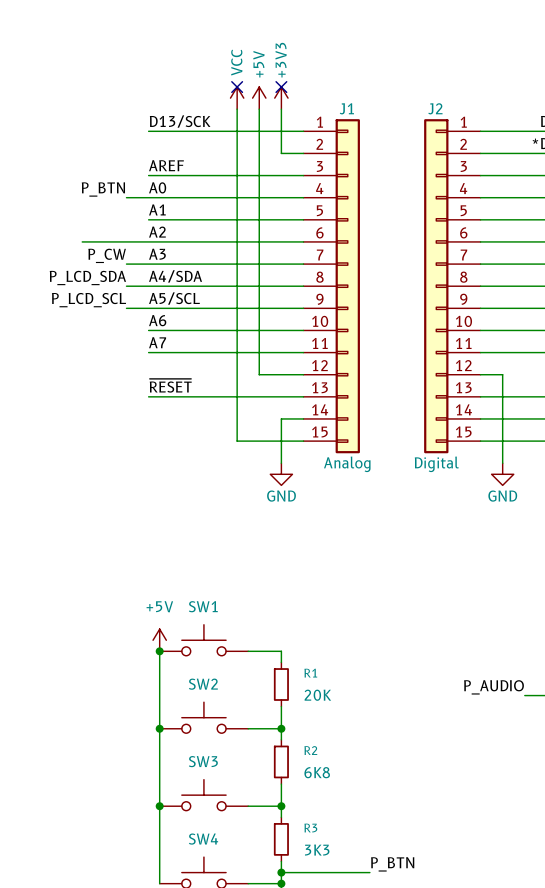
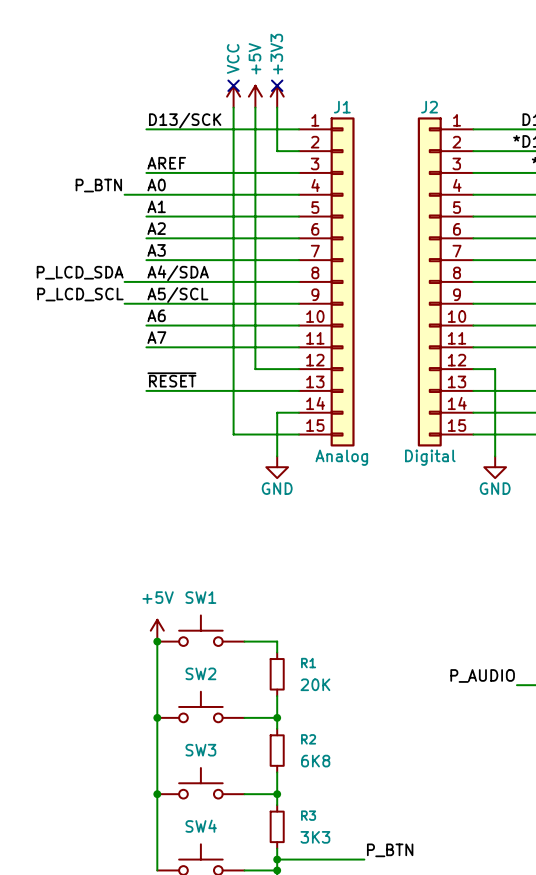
wire: (82, 241) (148, 241) -> none
label: P_CW (107, 255) -> none
wire: (126, 264) (148, 264) -> none

